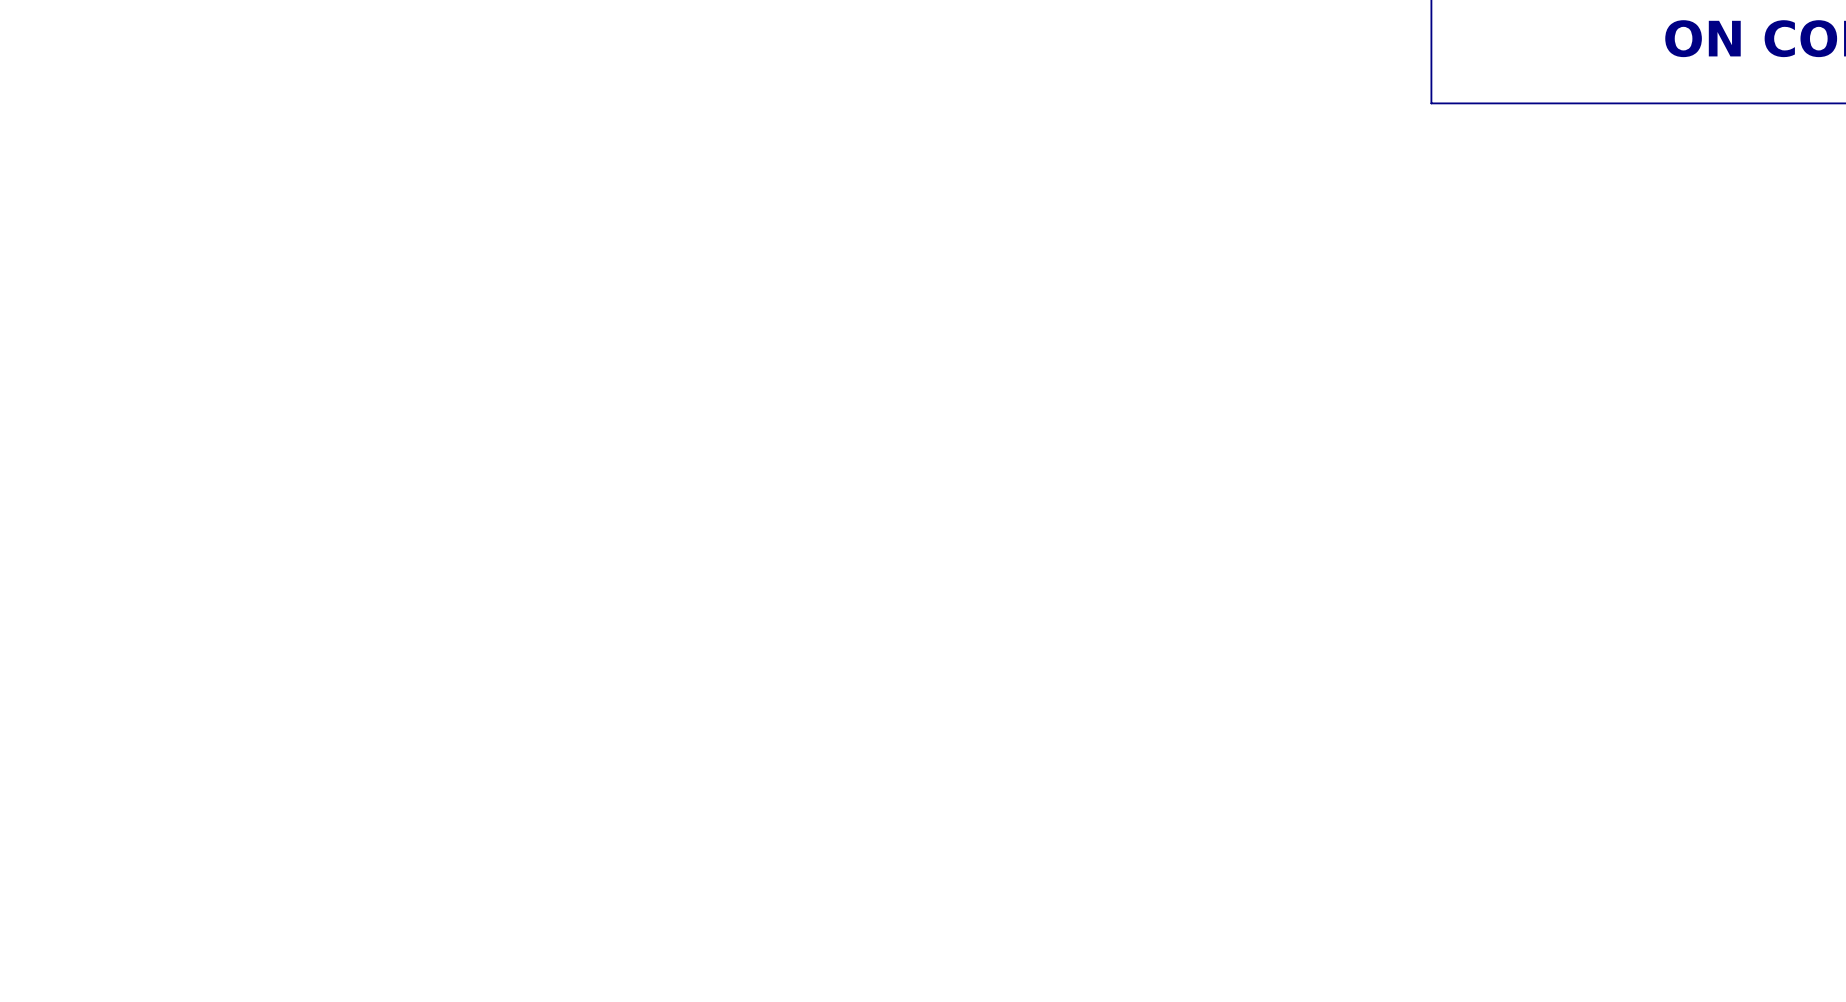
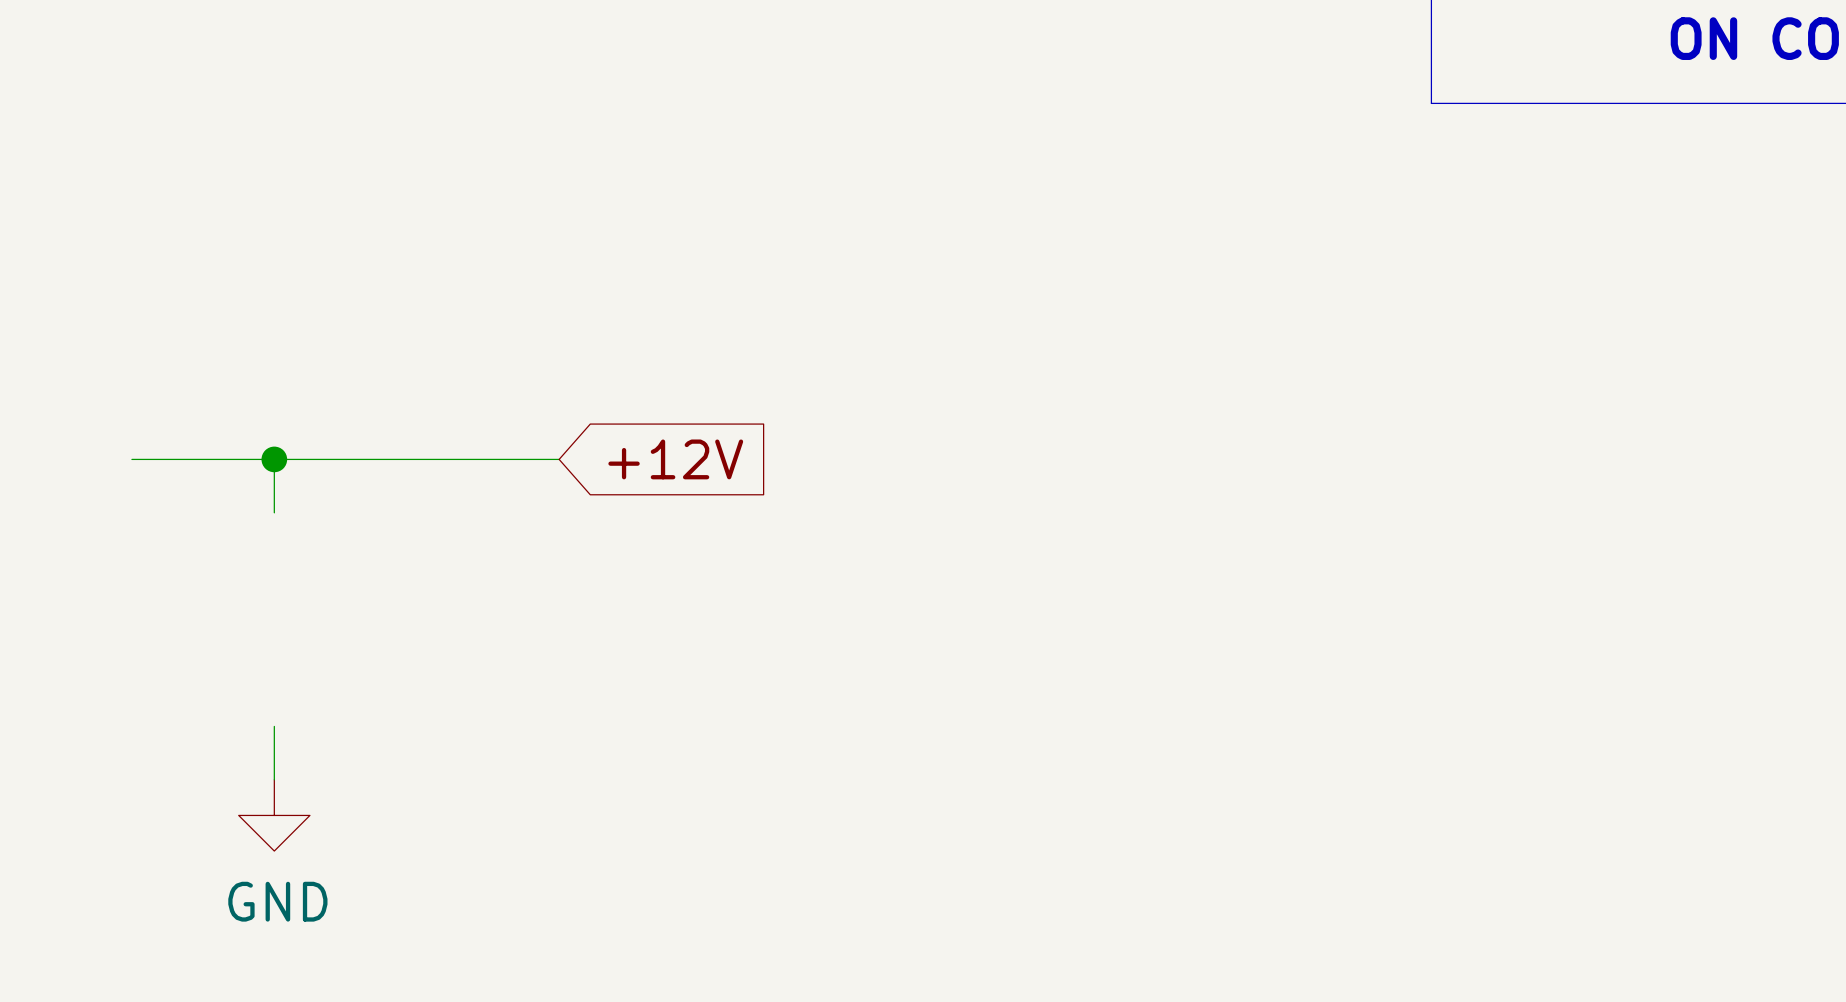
wire: none -> (131, 459) (559, 459)
wire: none -> (274, 459) (274, 512)
junction: none -> (274, 459)
global label: none -> +12V (675, 459)
wire: none -> (274, 726) (274, 779)
power symbol: none -> GND (274, 815)

